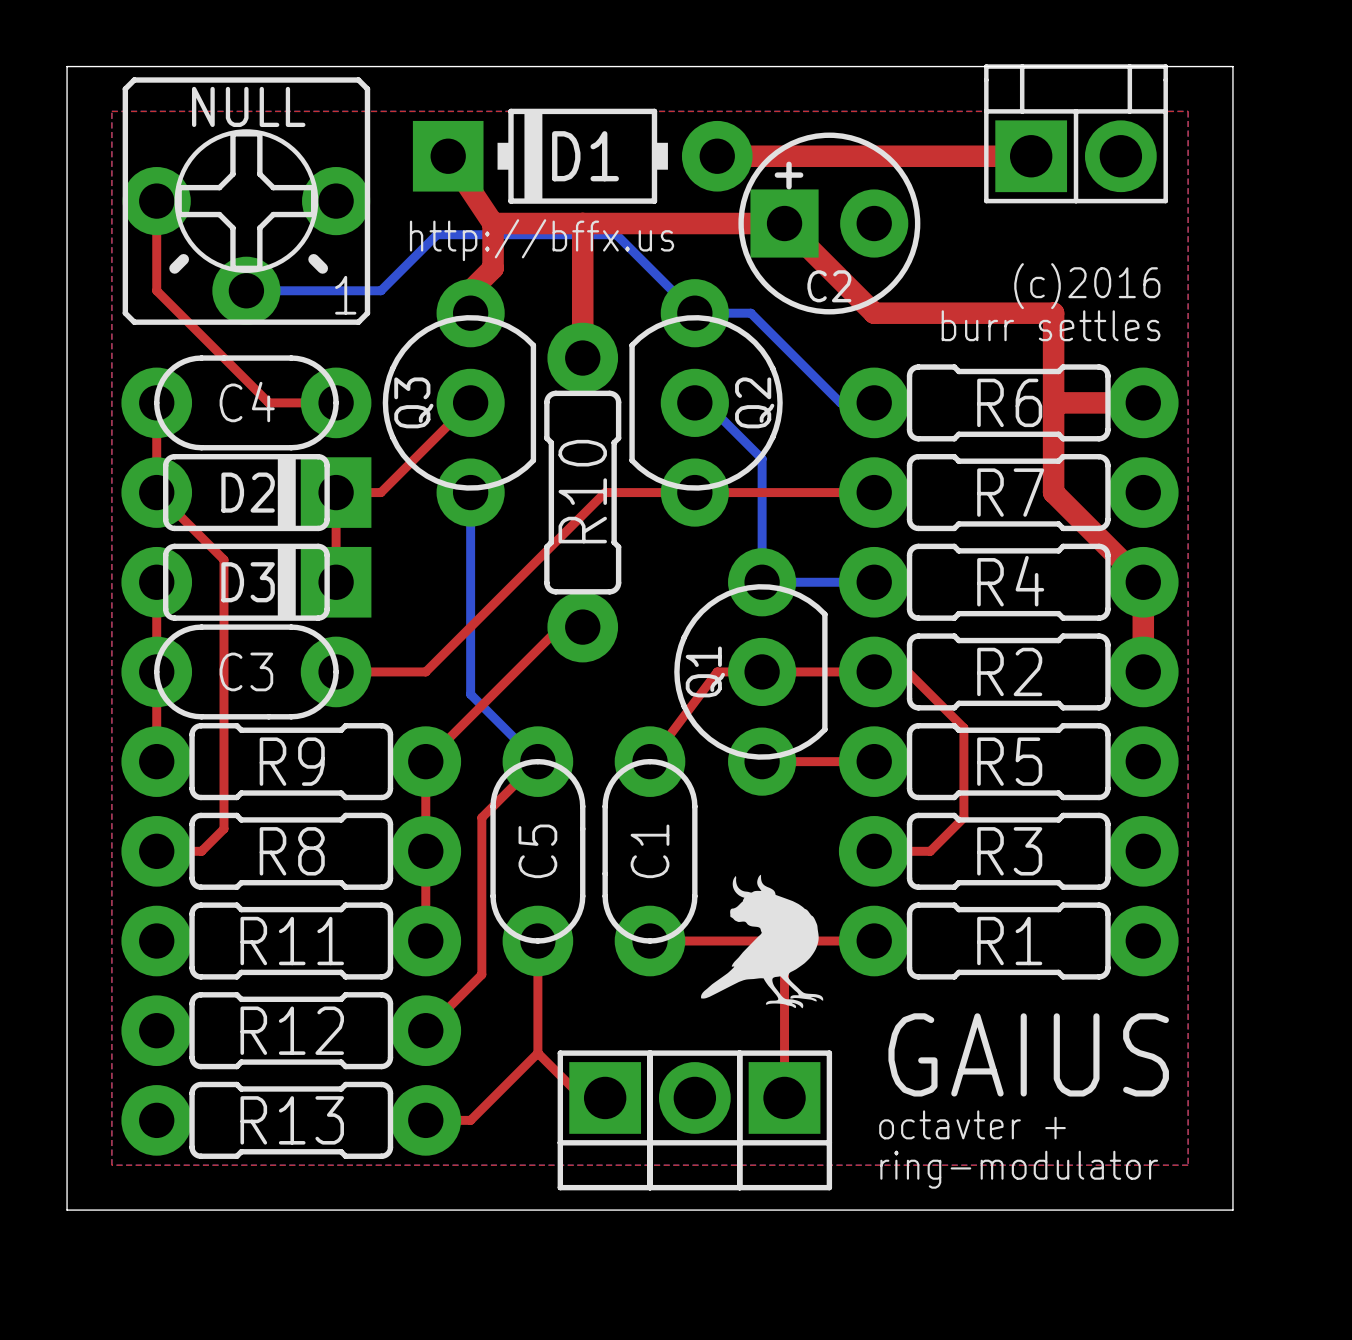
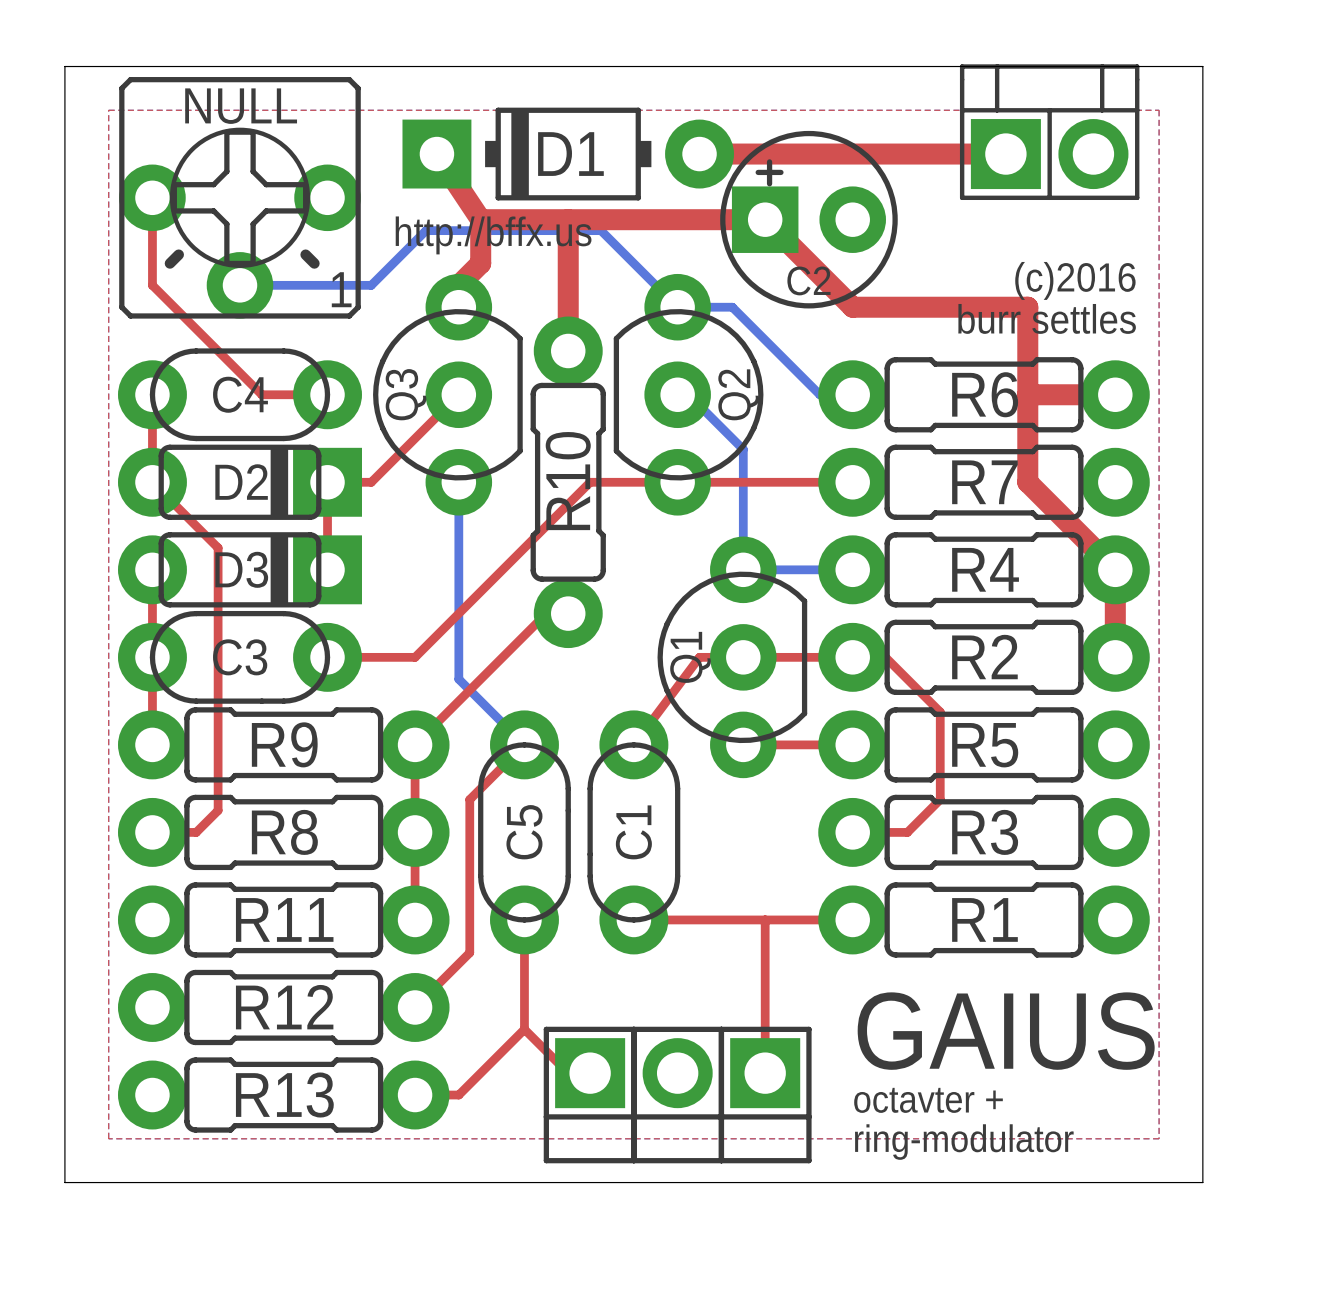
drawing: [701, 873, 824, 1009] -> none

